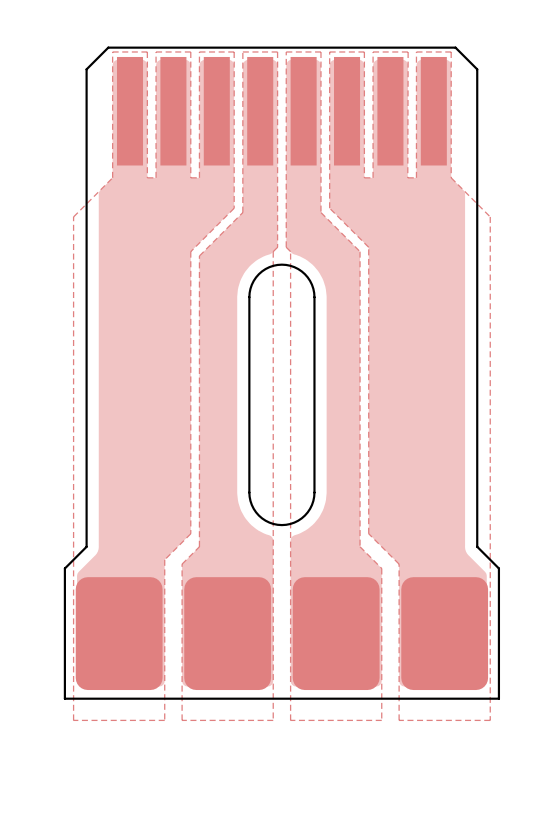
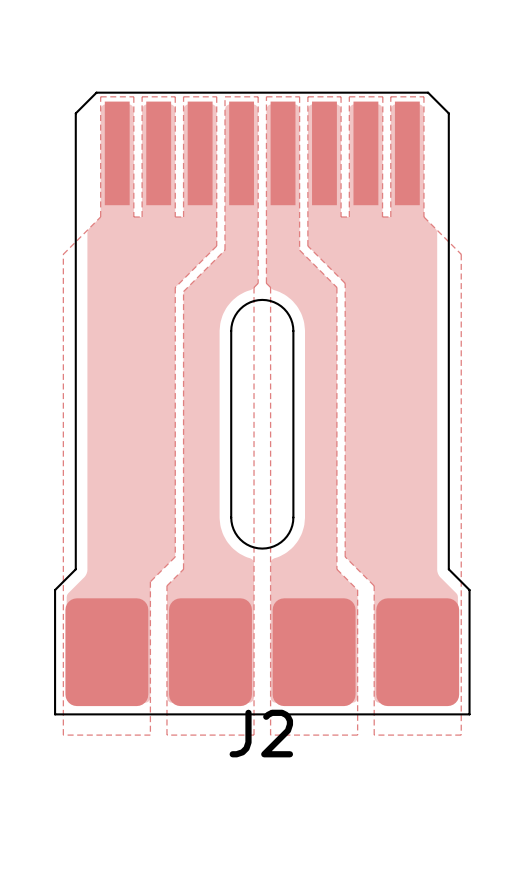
J2 name: none -> J2 (261, 733)

